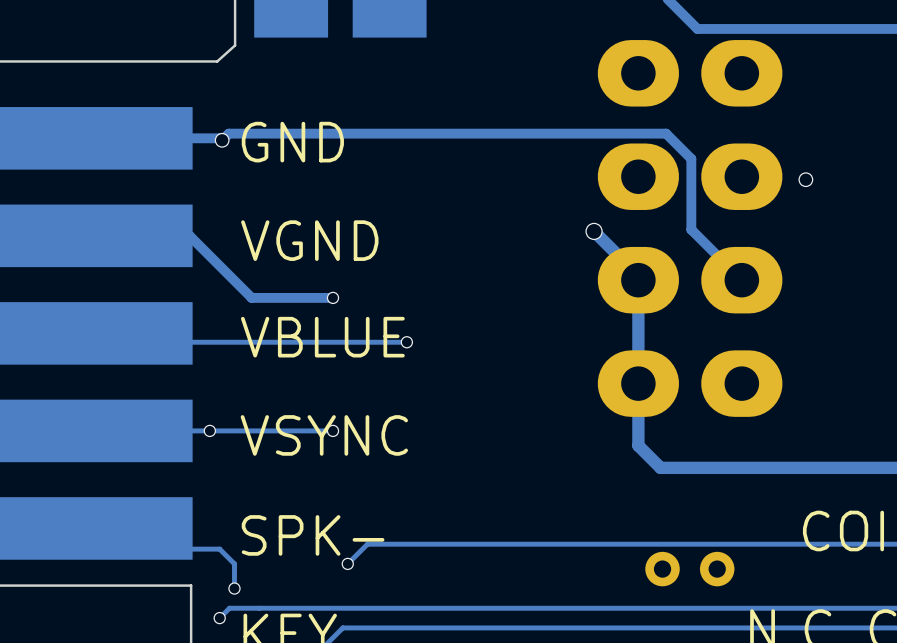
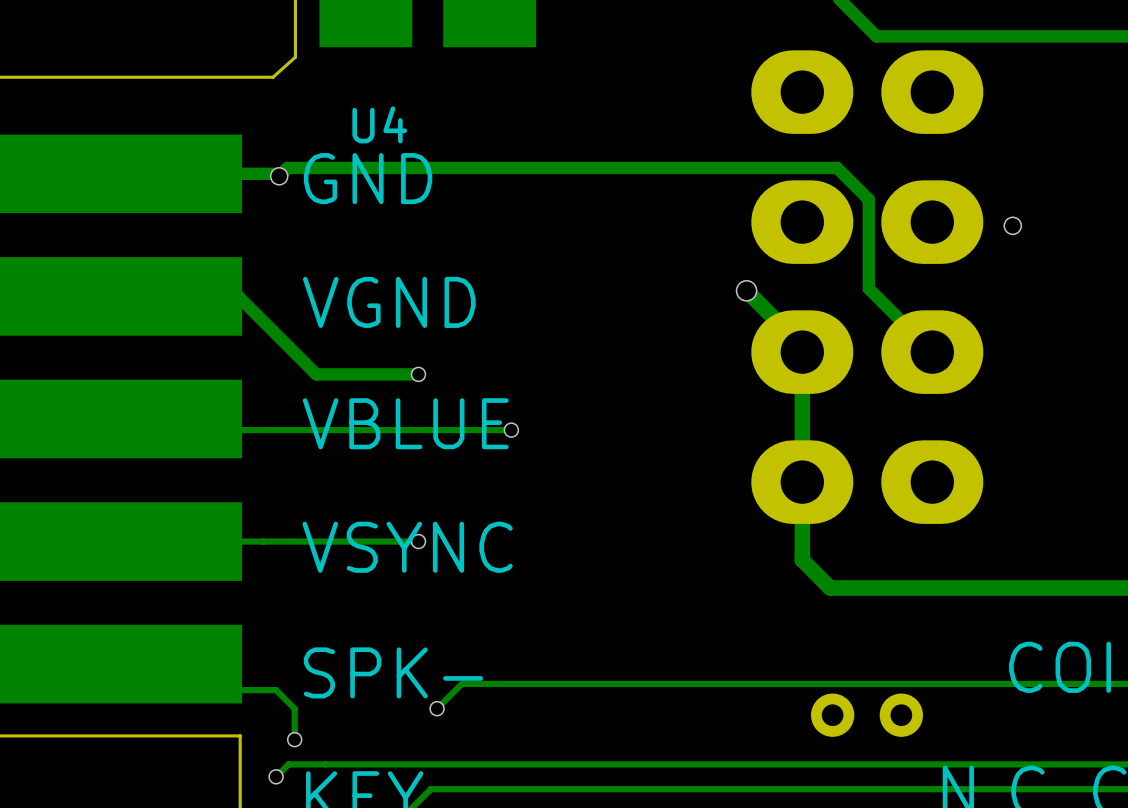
U4: none -> (379, 124)
via: (209, 430) -> none

